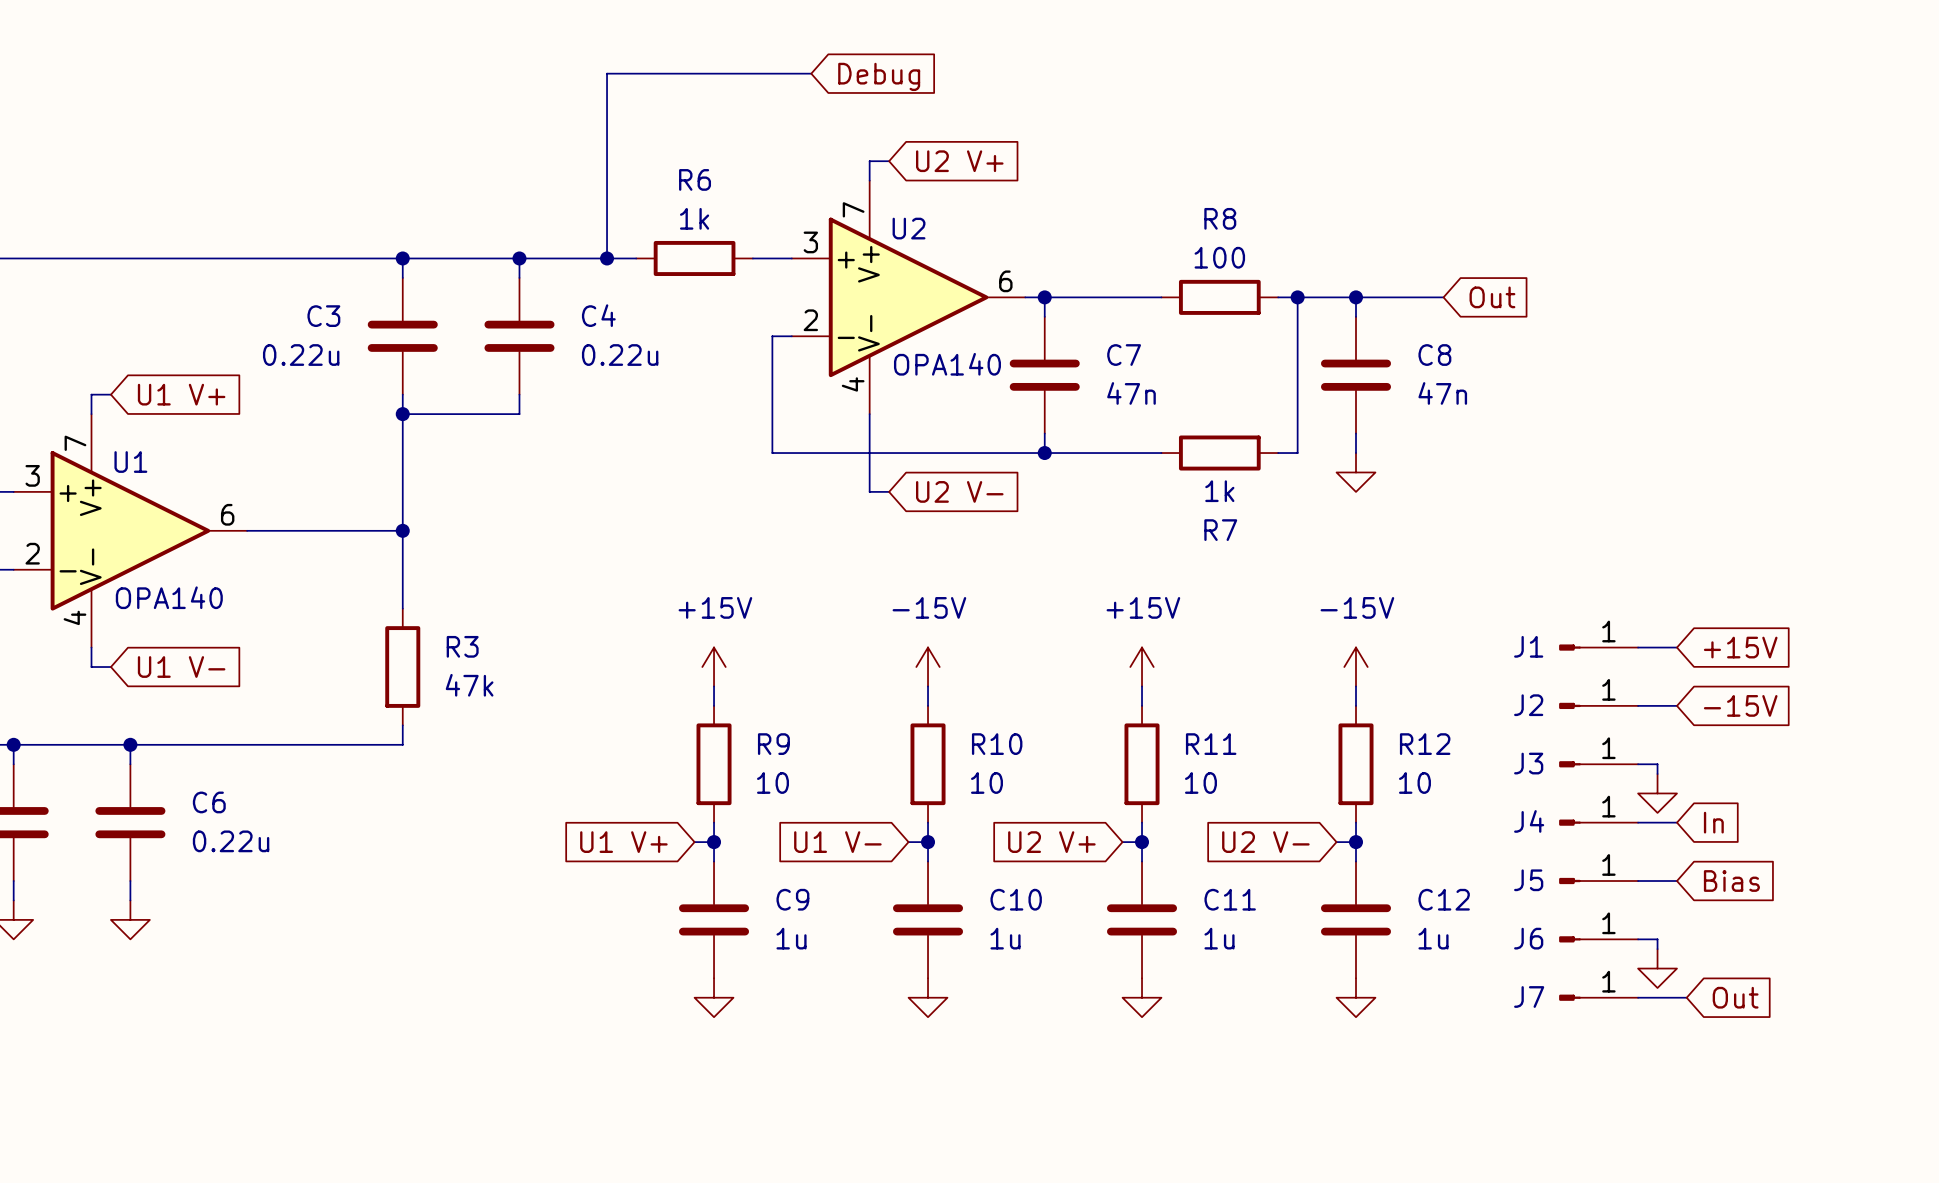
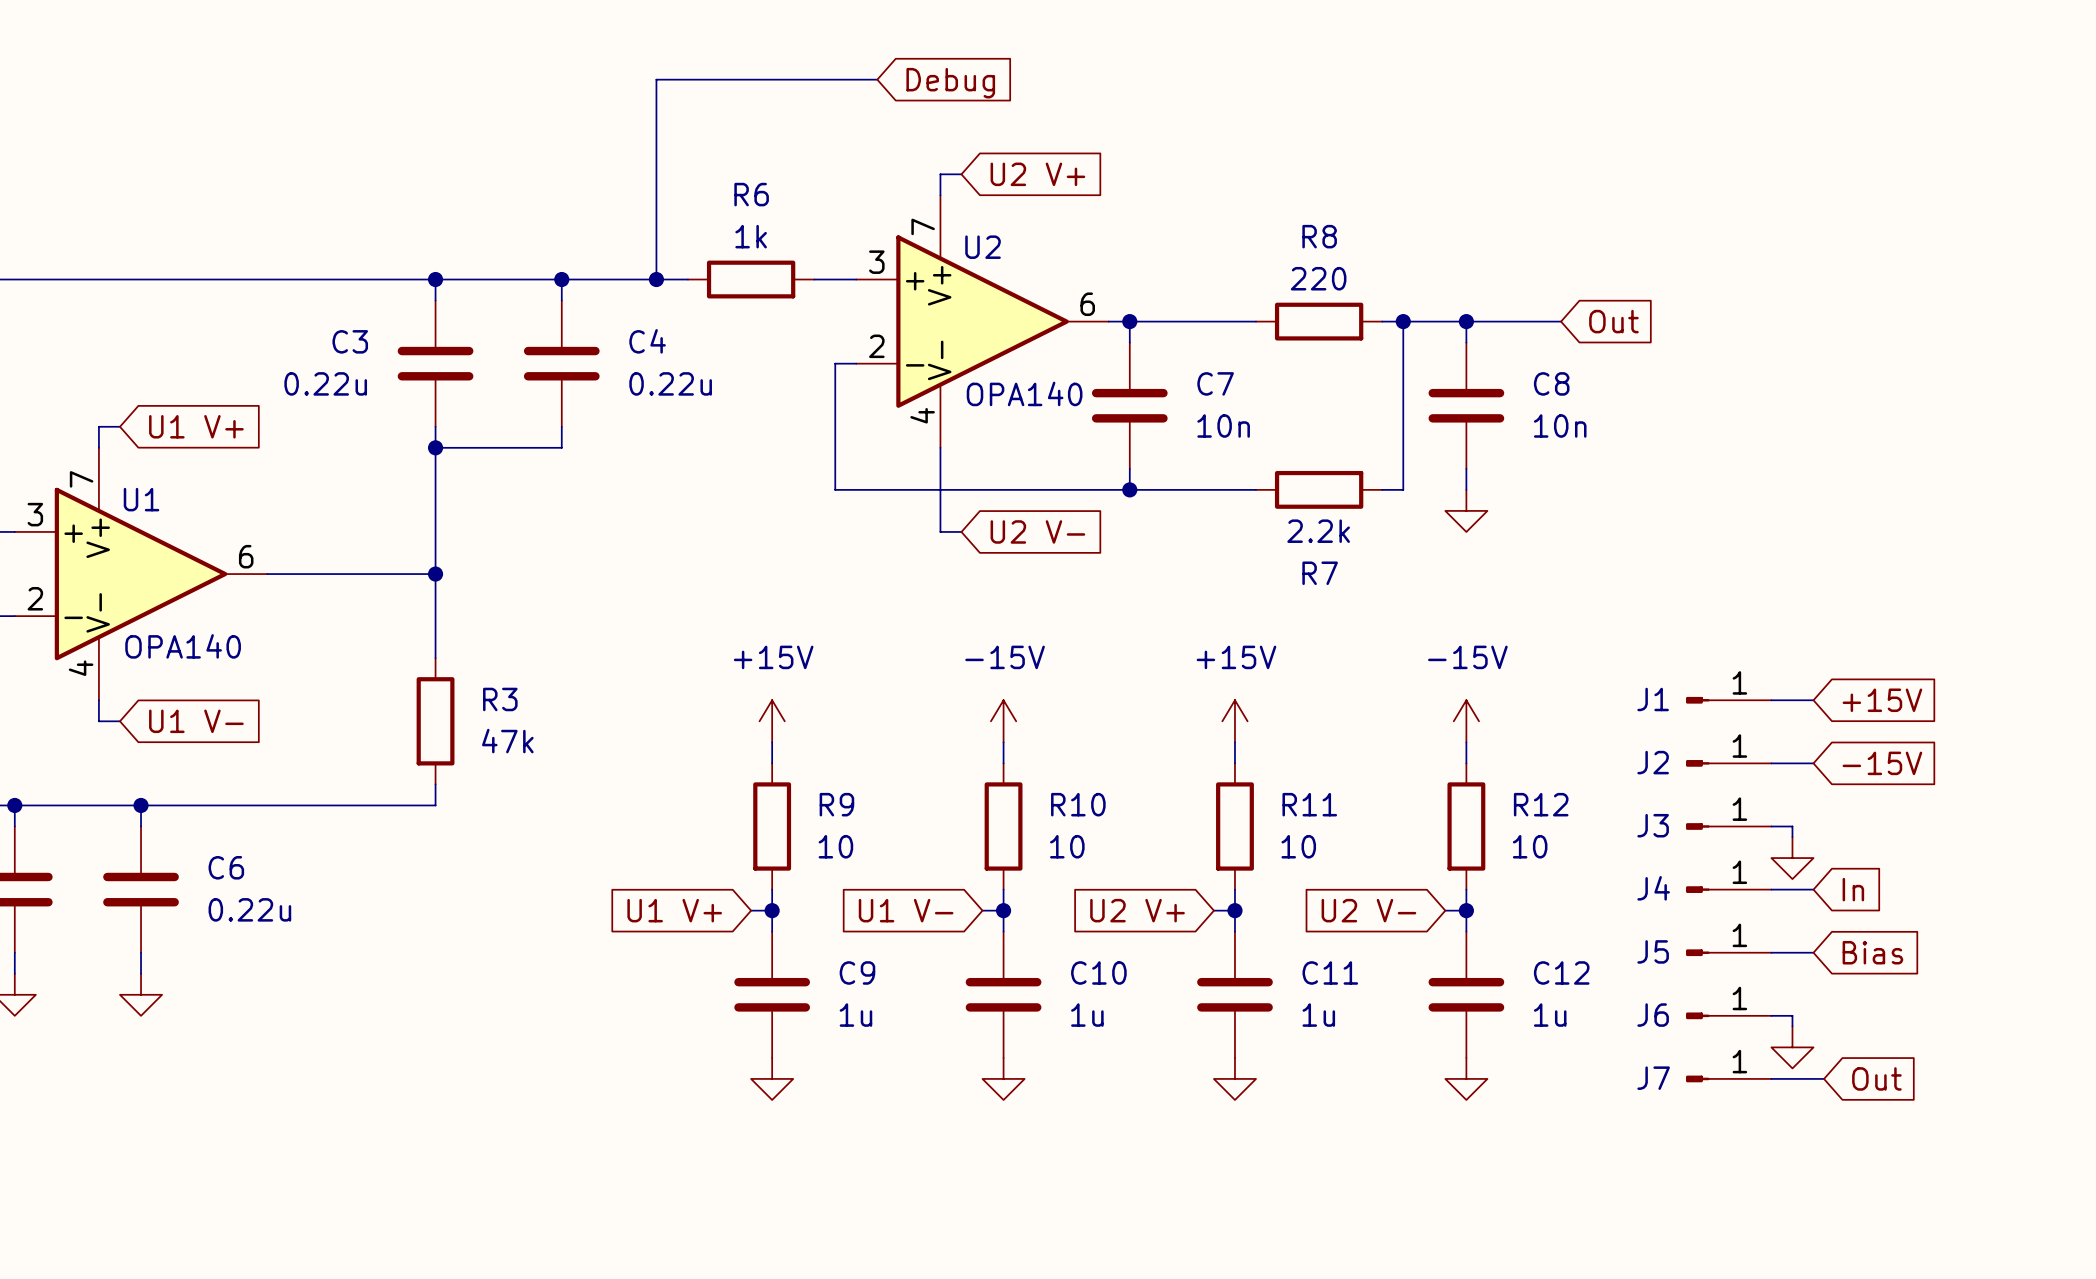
R8 value: 100 (1219, 257) -> 220 (1318, 278)
C7 value: 47n (1131, 393) -> 10n (1223, 425)
C8 value: 47n (1442, 393) -> 10n (1560, 425)
R7 value: 1k (1219, 491) -> 2.2k (1318, 531)

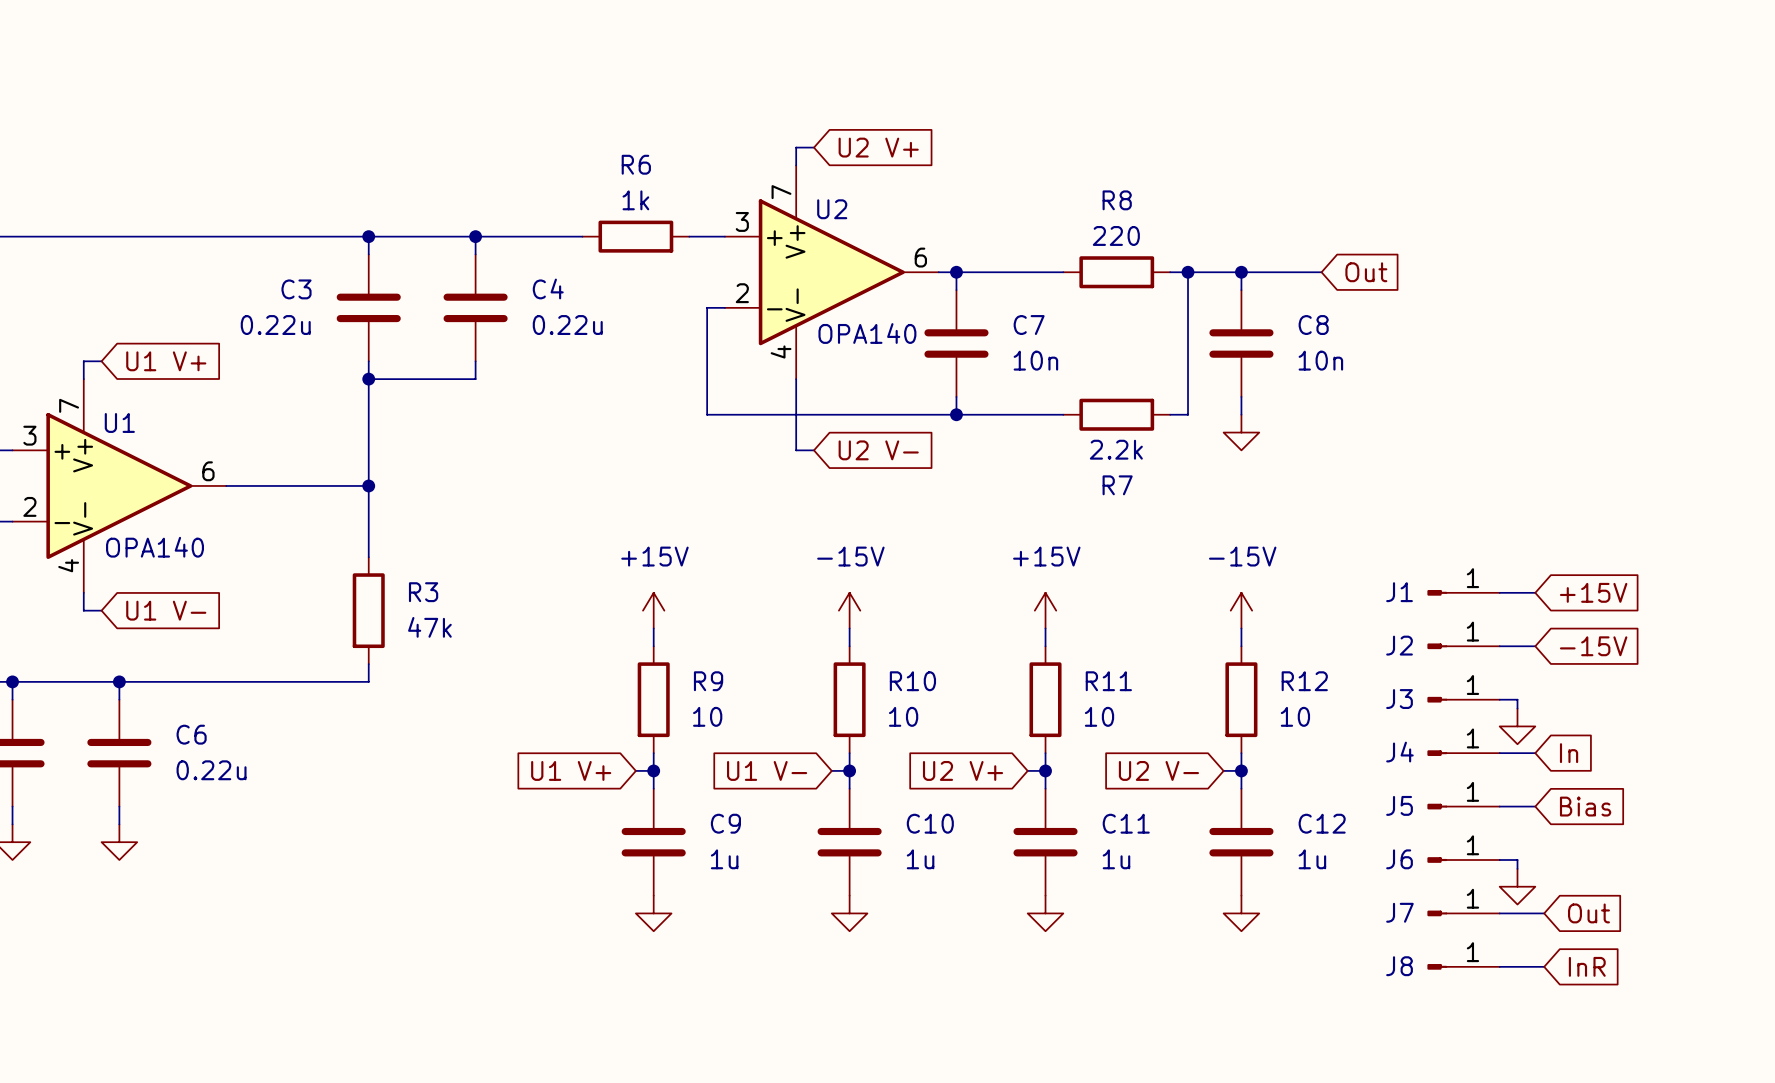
wire: (877, 79) (656, 79) (656, 279) -> none
global label: Debug (950, 83) -> none
junction: (656, 279) -> none
J8: none -> (1463, 966)
wire: none -> (1499, 966) (1544, 966)
global label: none -> InR (1587, 966)

